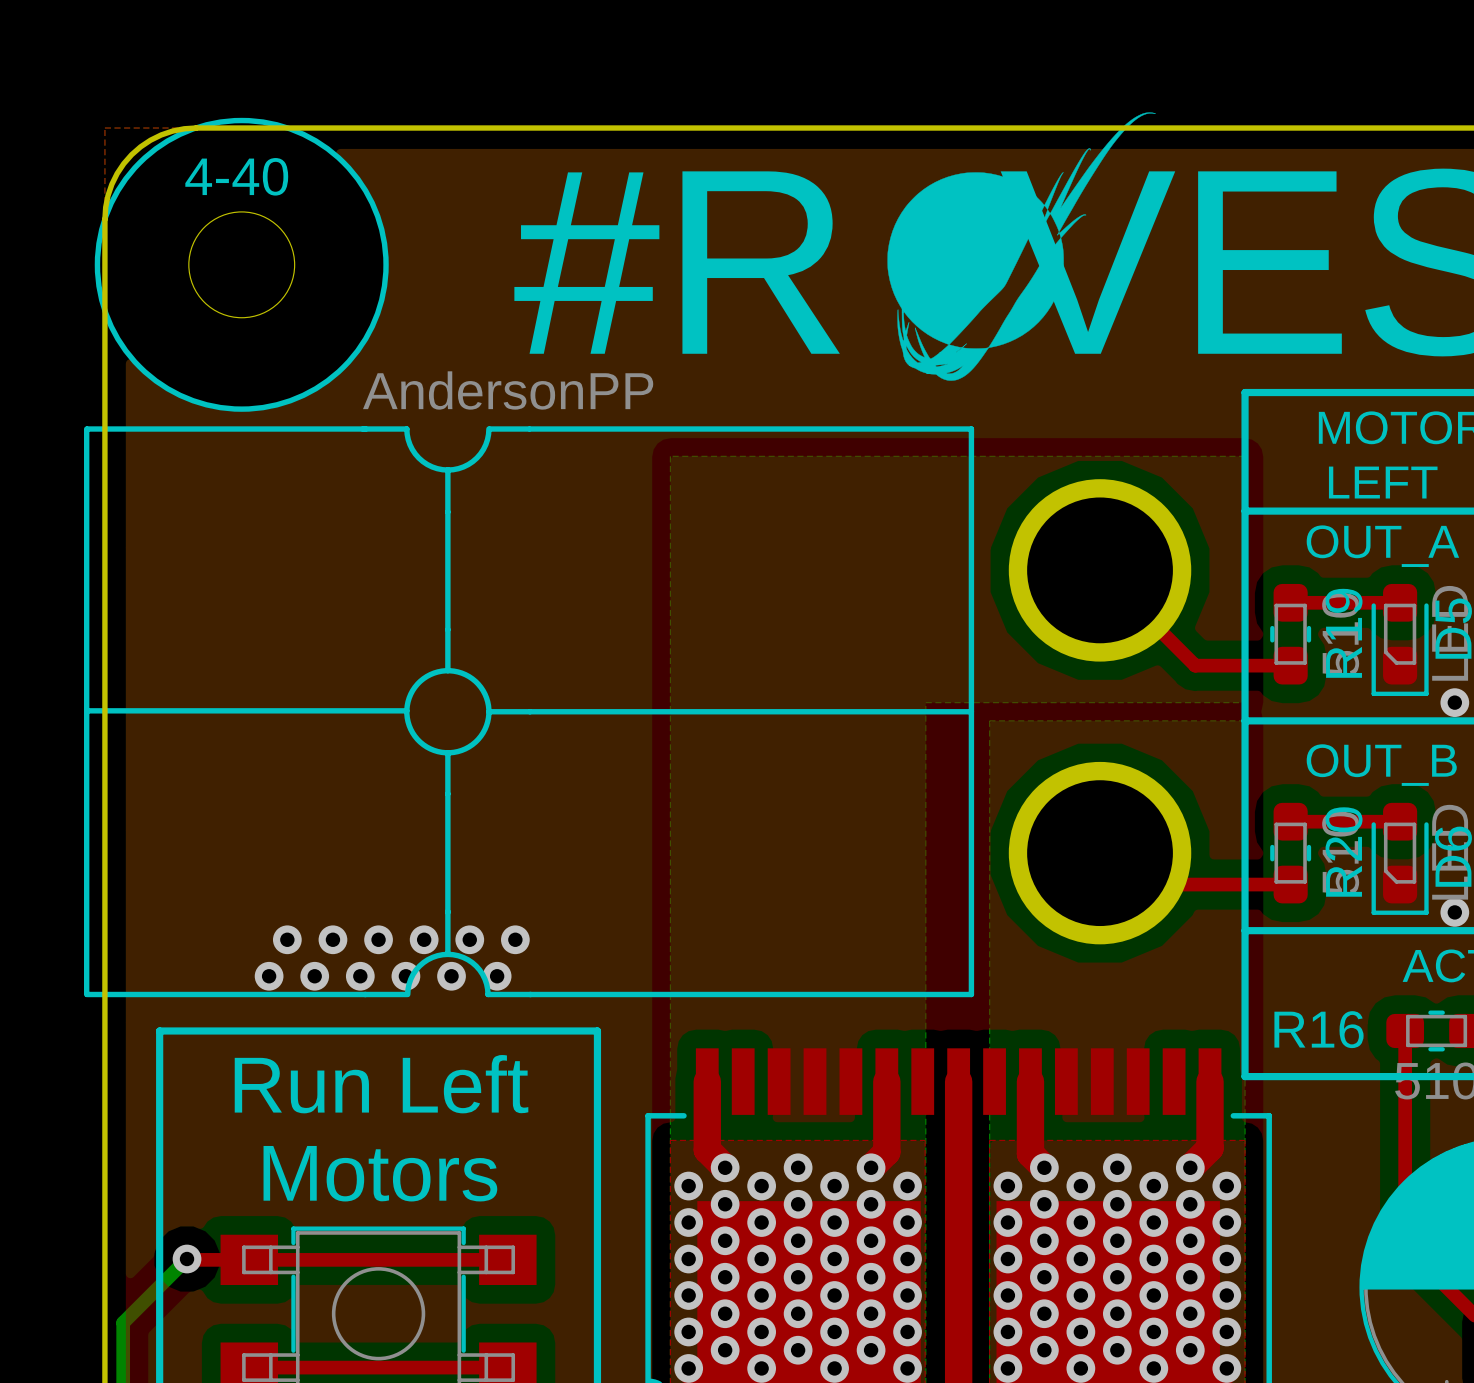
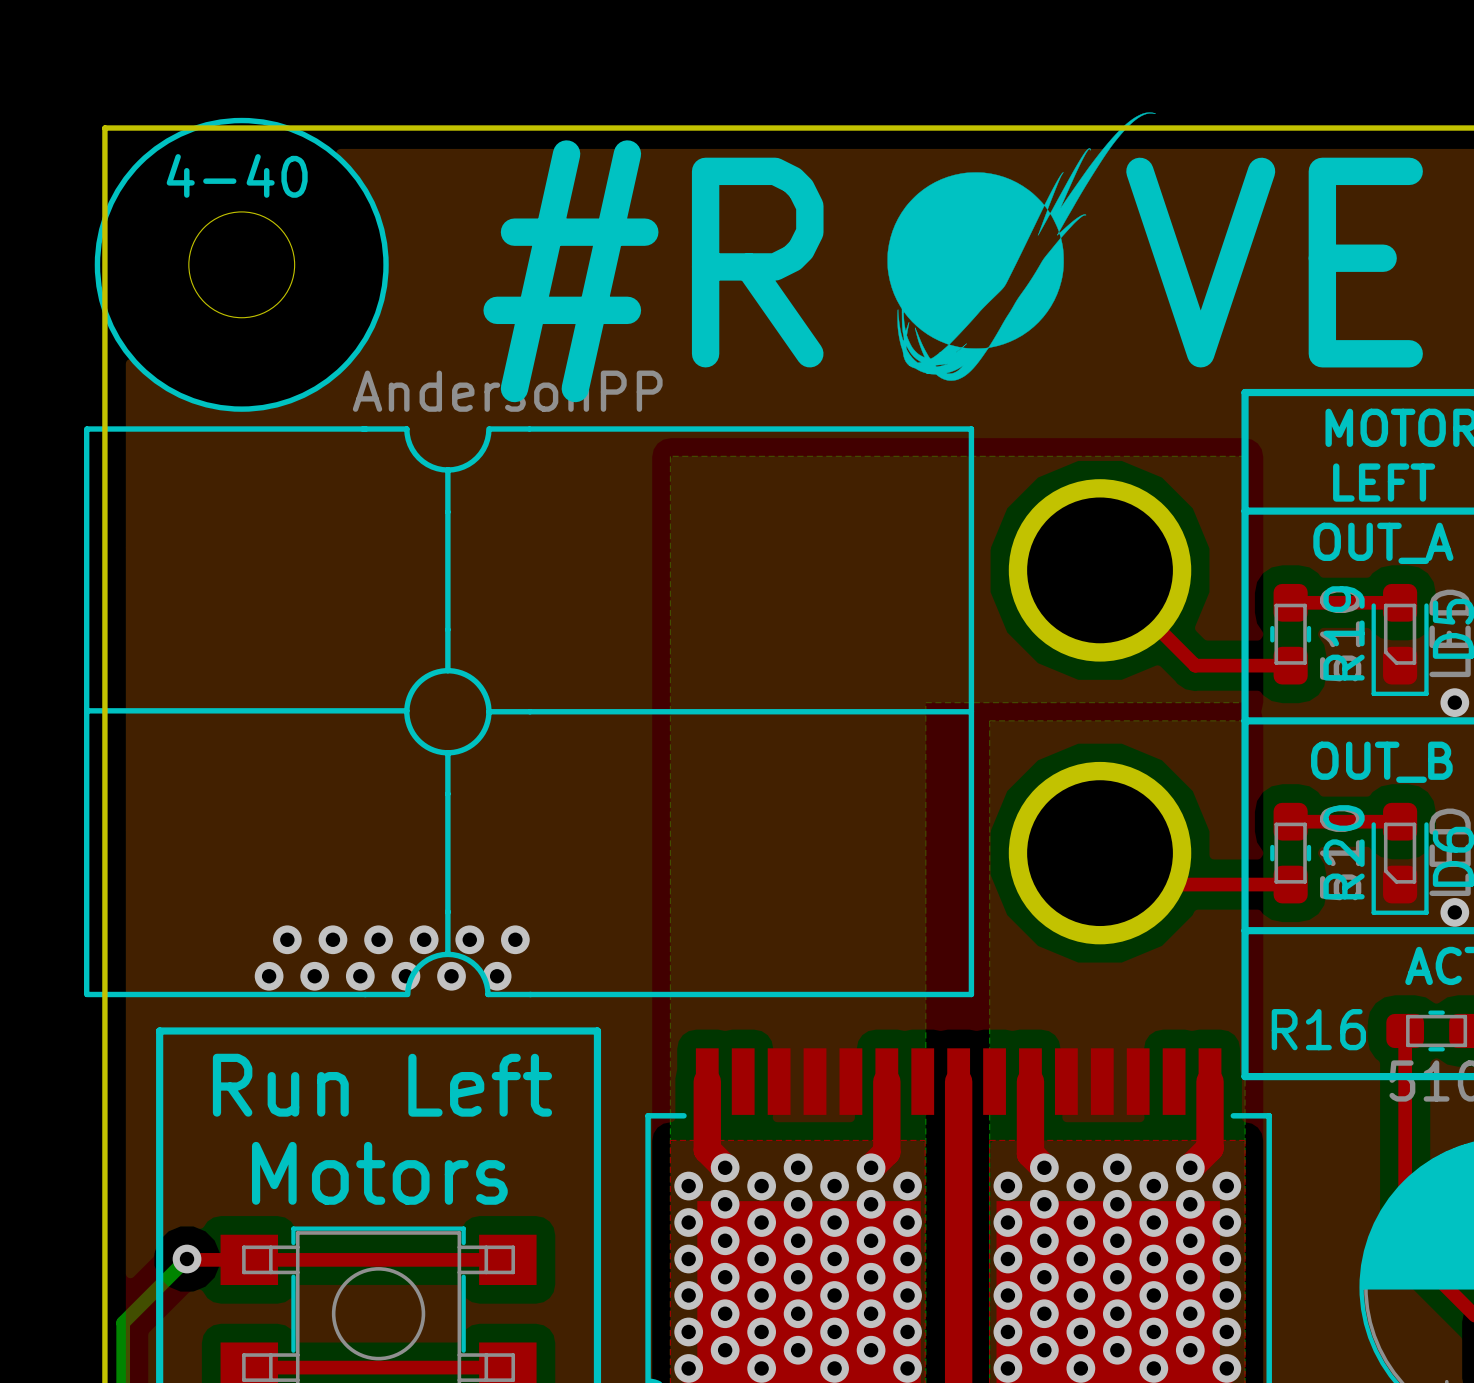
board edge: (196, 128) (172, 131) (161, 134) (150, 140) (131, 154) (123, 163) (111, 184) (108, 195) (104, 219) -> (196, 128) (104, 128) (104, 219)

